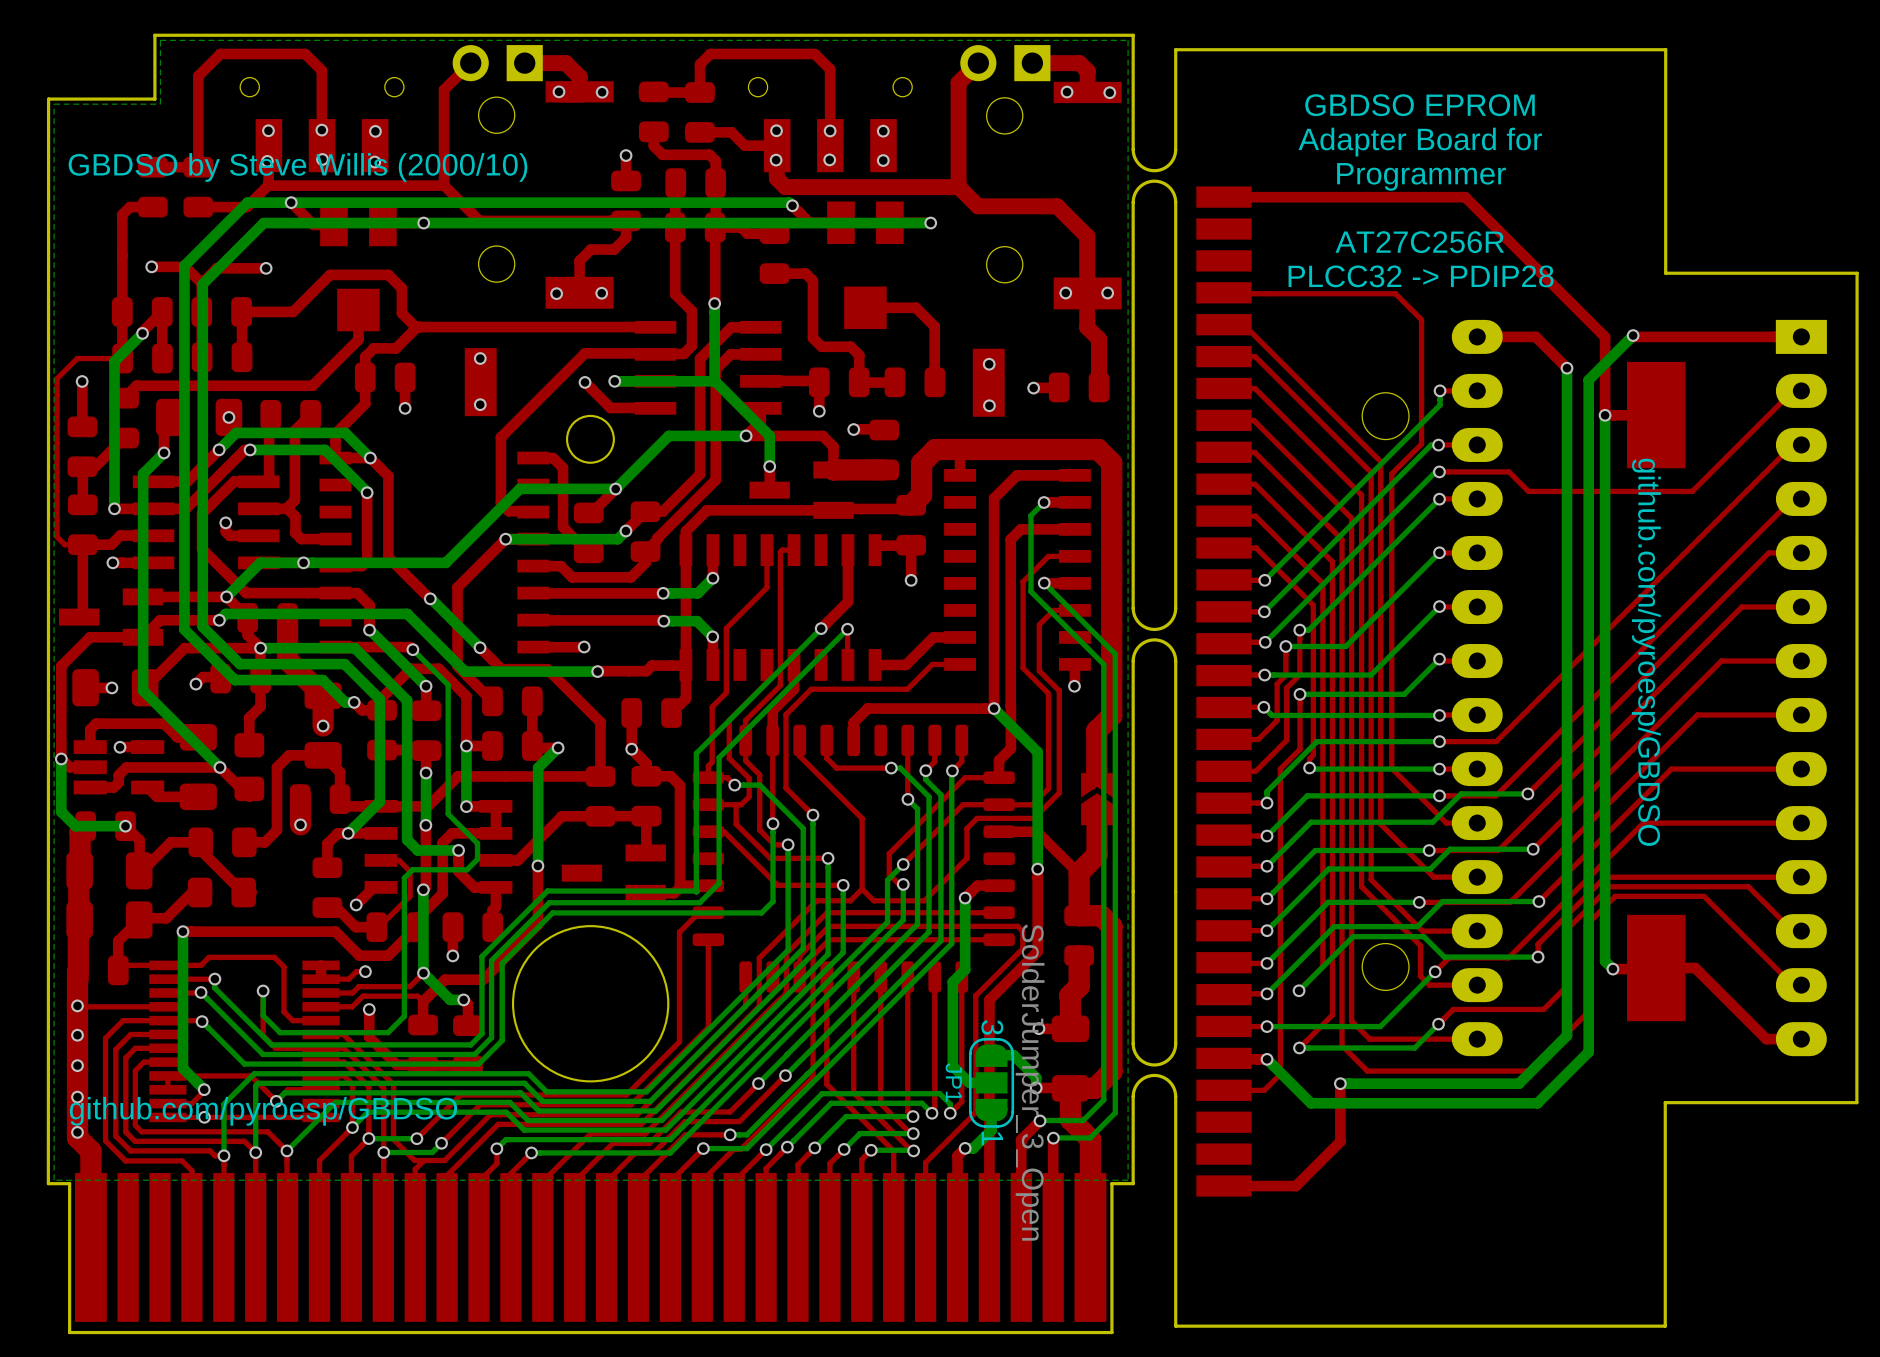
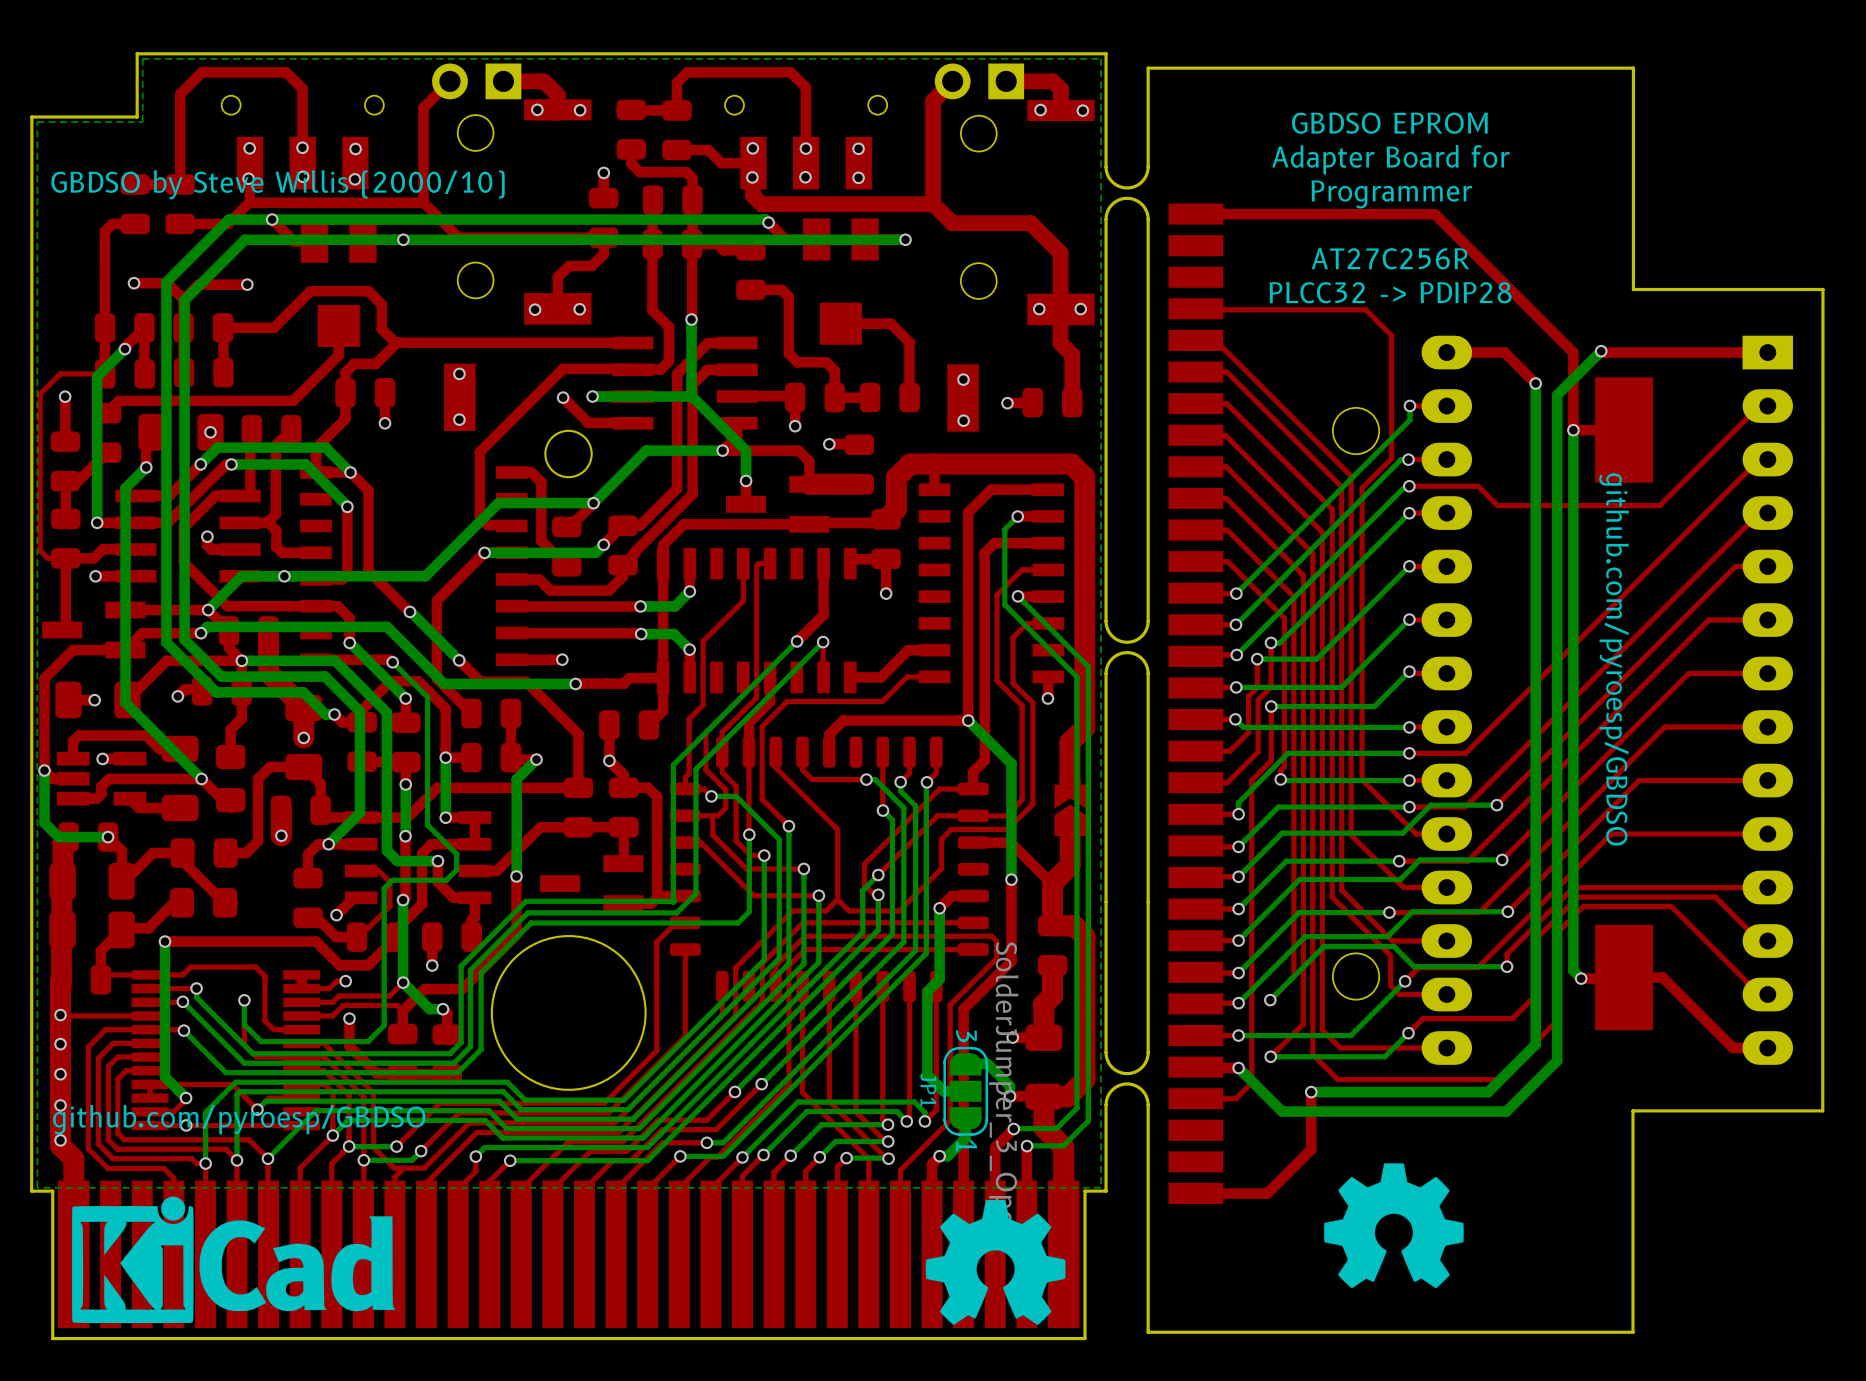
drawing: none -> [1324, 1163, 1464, 1289]
drawing: none -> [71, 1196, 396, 1324]
drawing: none -> [925, 1199, 1066, 1325]

